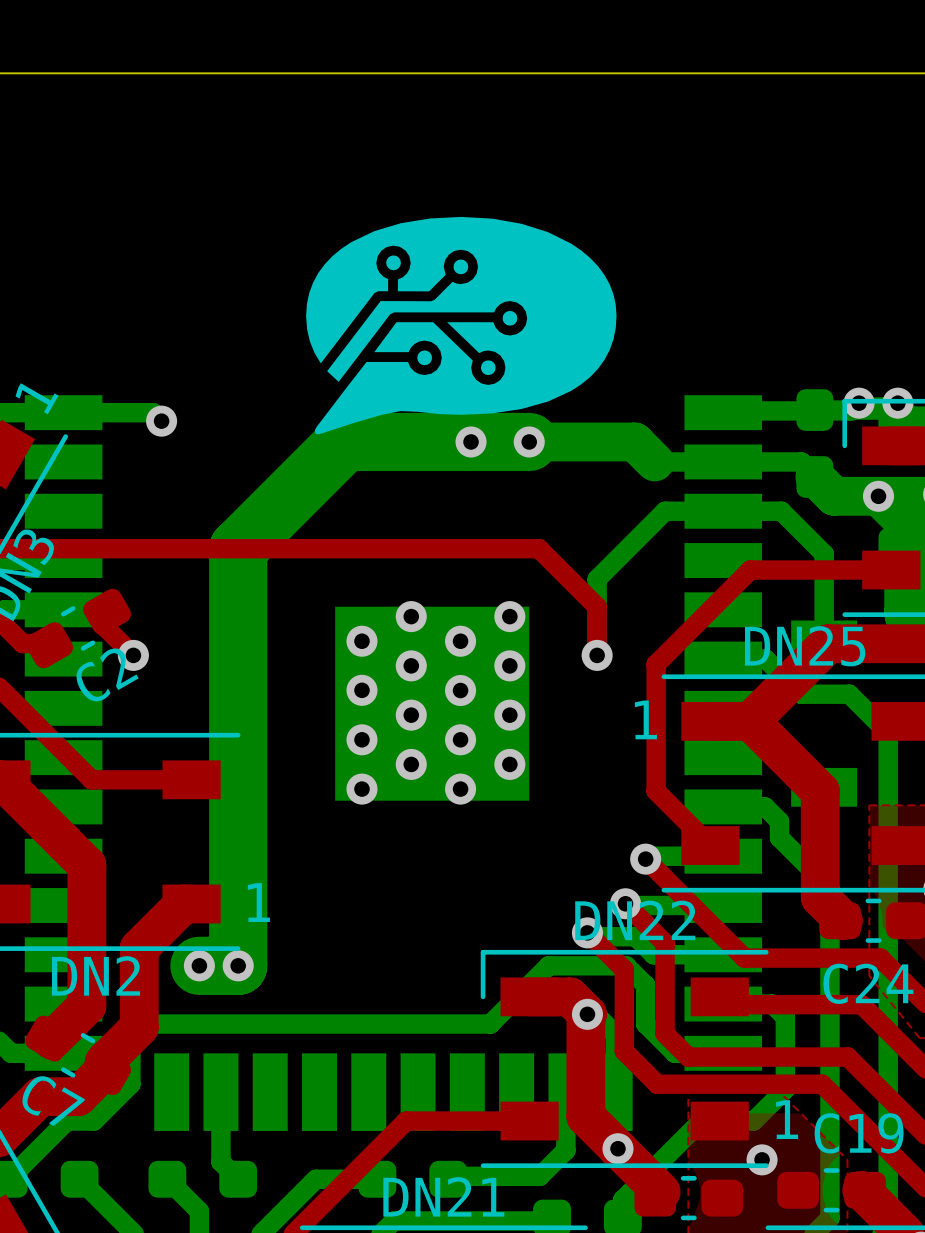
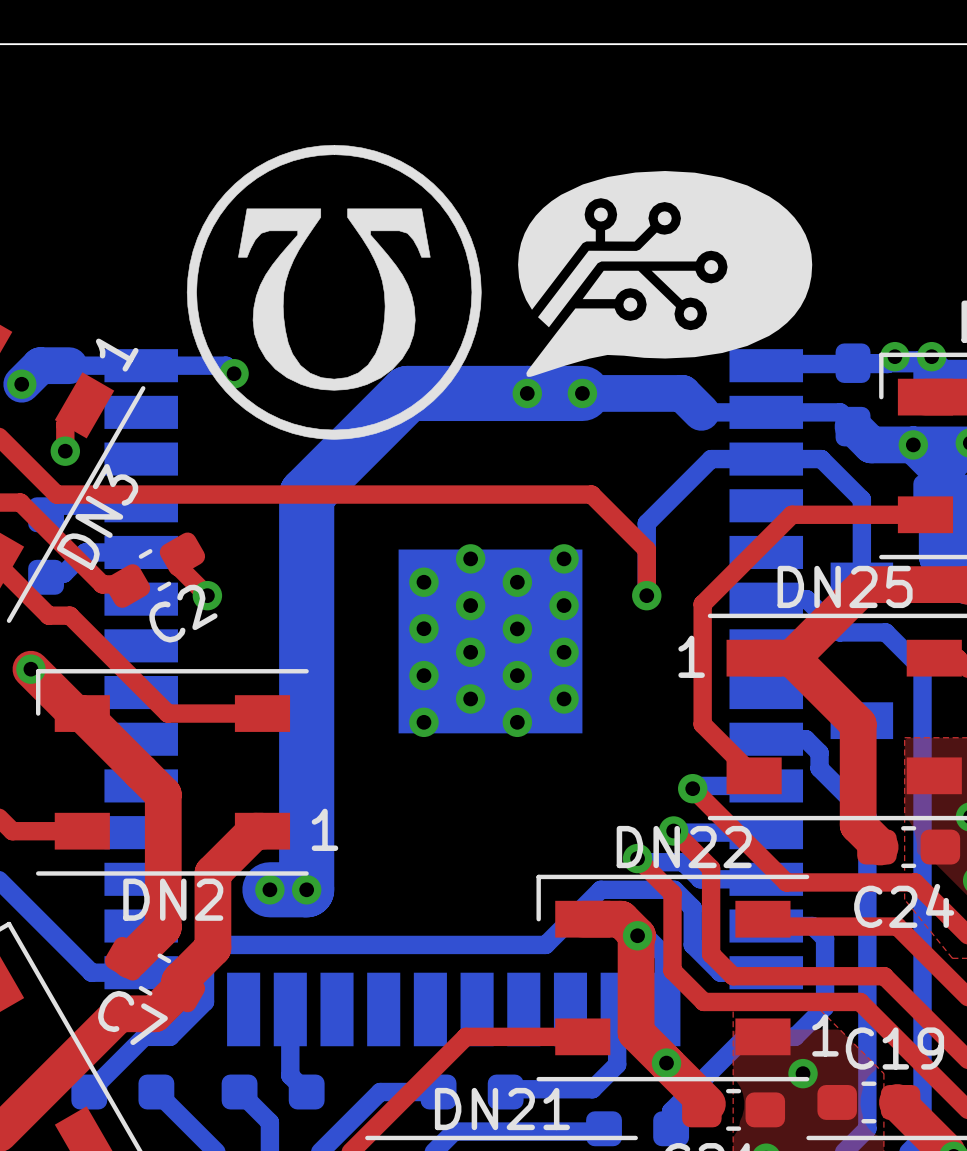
drawing: none -> [186, 144, 482, 440]
drawing position: (461, 325) -> (665, 273)

